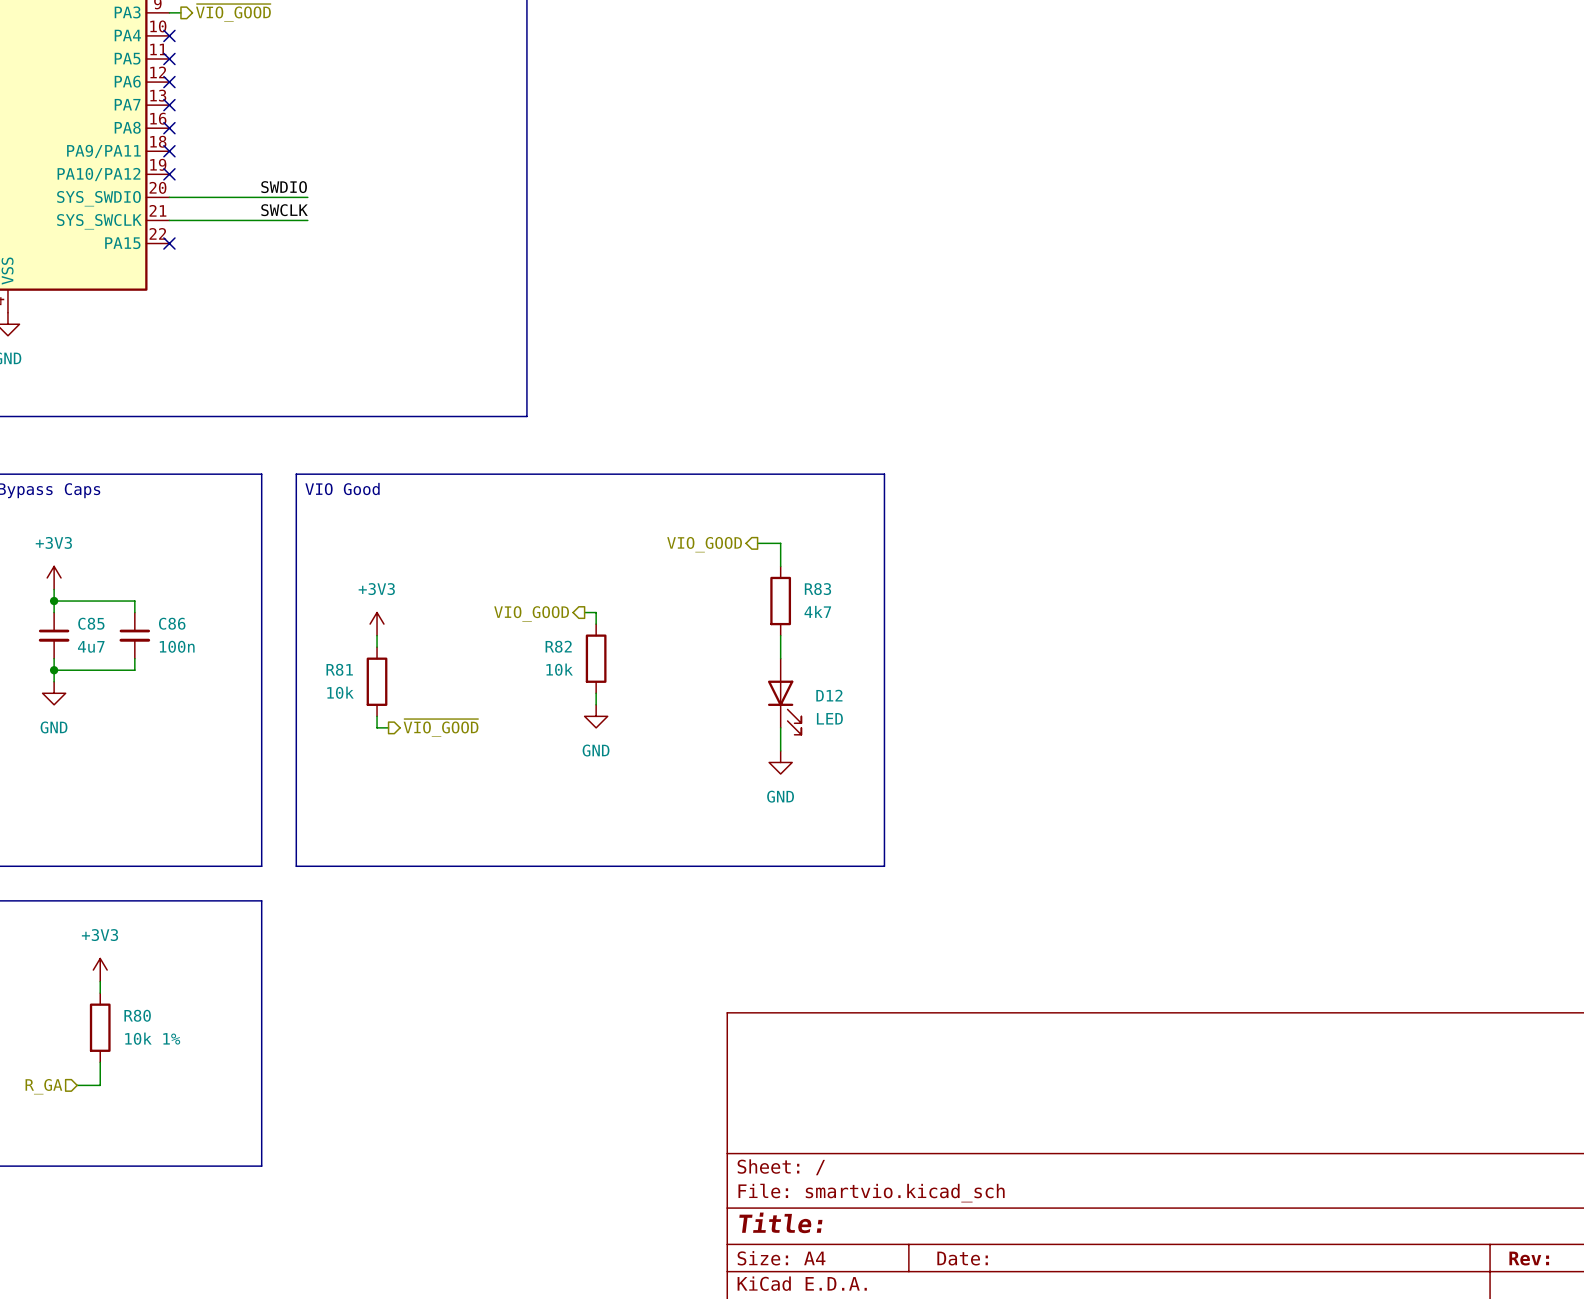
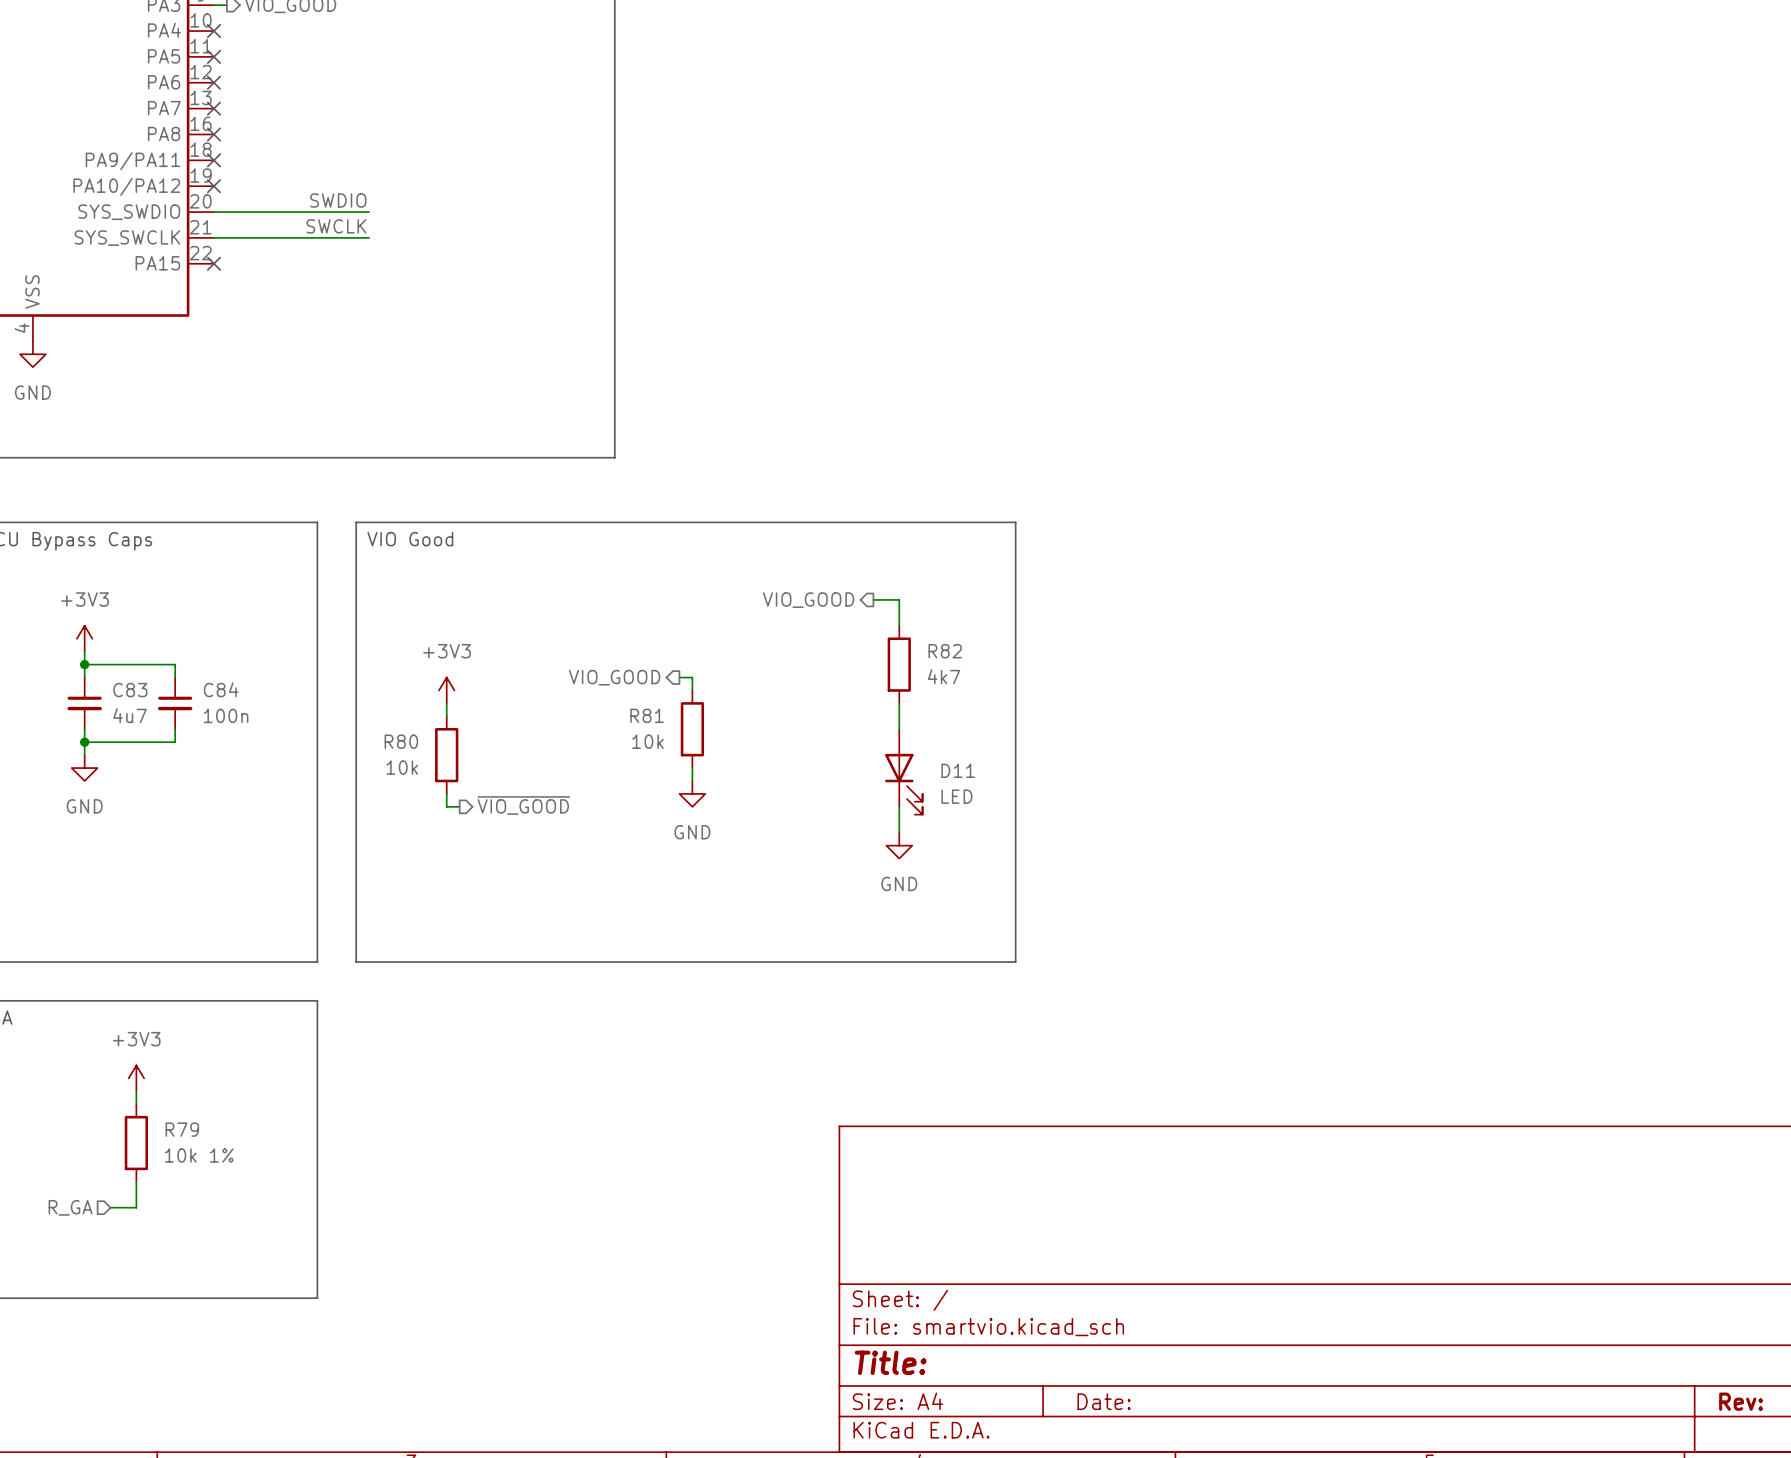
R83 name: R83 (817, 589) -> R82 (945, 651)
C85 name: C85 (91, 623) -> C83 (130, 690)
C86 name: C86 (172, 623) -> C84 (221, 689)
R82 name: R82 (558, 646) -> R81 (647, 715)
R81 name: R81 (339, 669) -> R80 (401, 741)
D12 name: D12 (829, 695) -> D11 (958, 770)
R80 name: R80 (137, 1015) -> R79 (182, 1129)

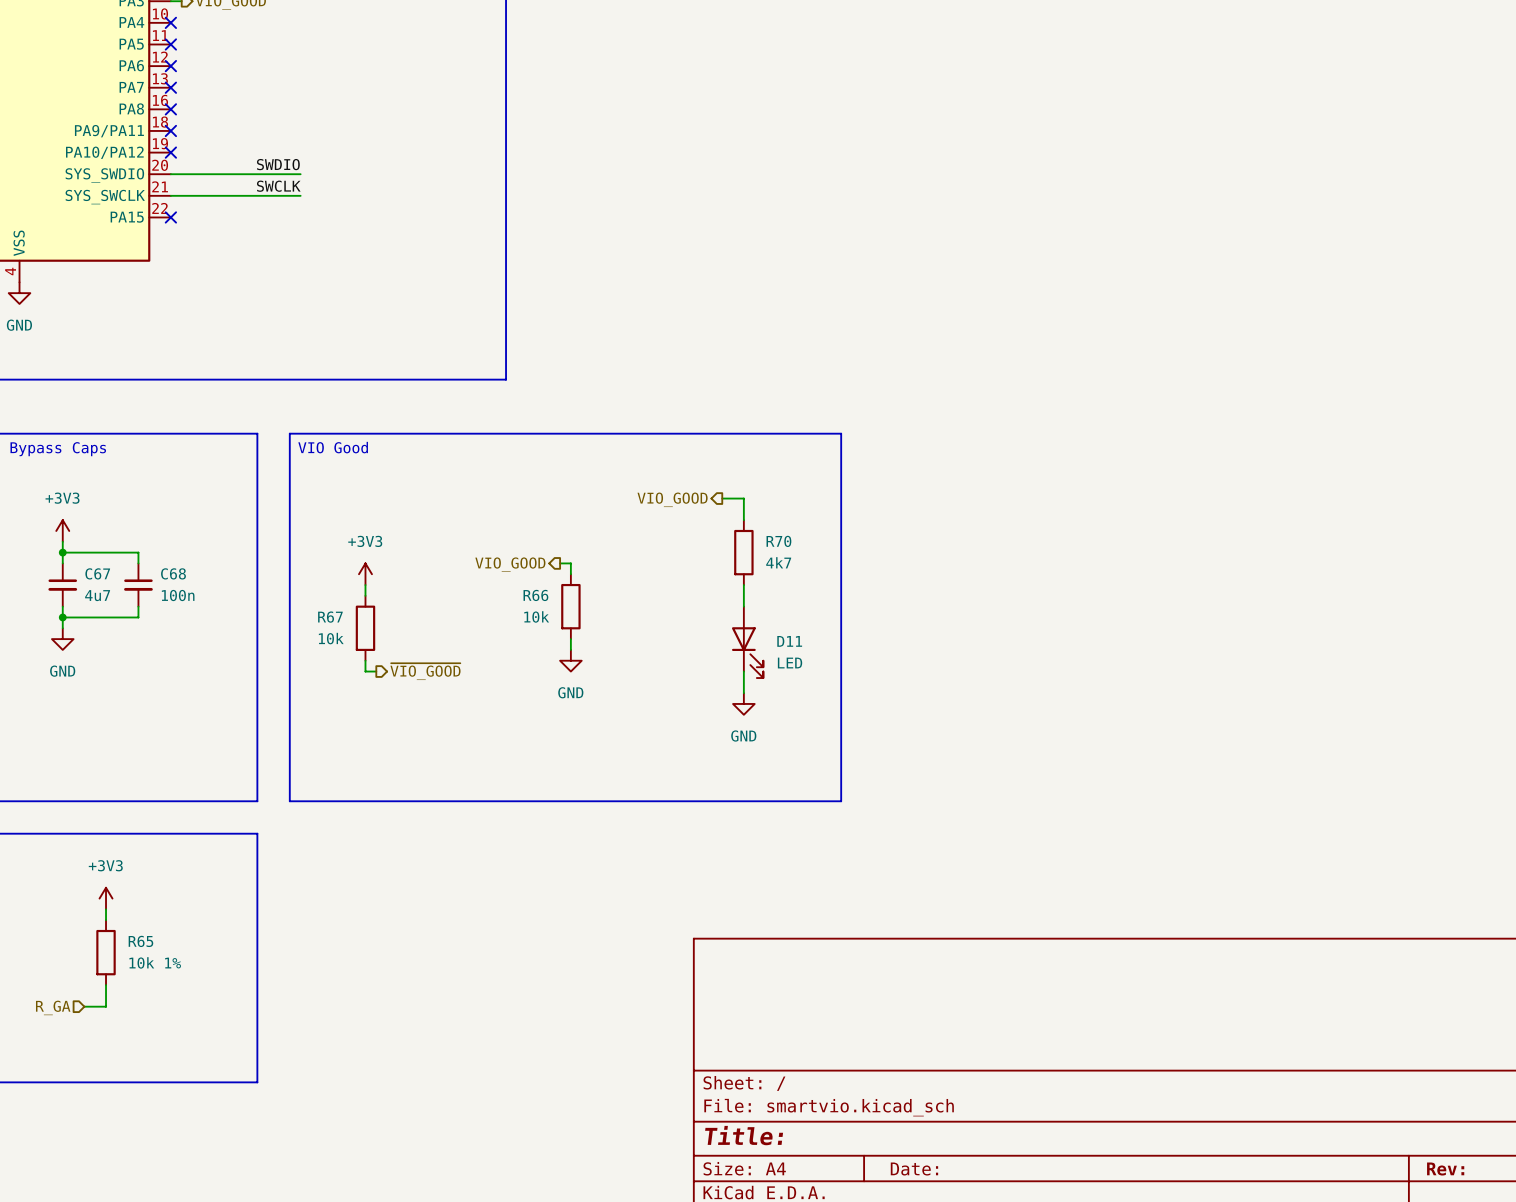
R82 name: R82 (945, 651) -> R70 (778, 541)
C84 name: C84 (221, 689) -> C68 (173, 573)
C83 name: C83 (130, 690) -> C67 (97, 573)
R81 name: R81 (647, 715) -> R66 (535, 595)
R80 name: R80 (401, 741) -> R67 (330, 617)
R79 name: R79 (182, 1129) -> R65 (140, 941)

